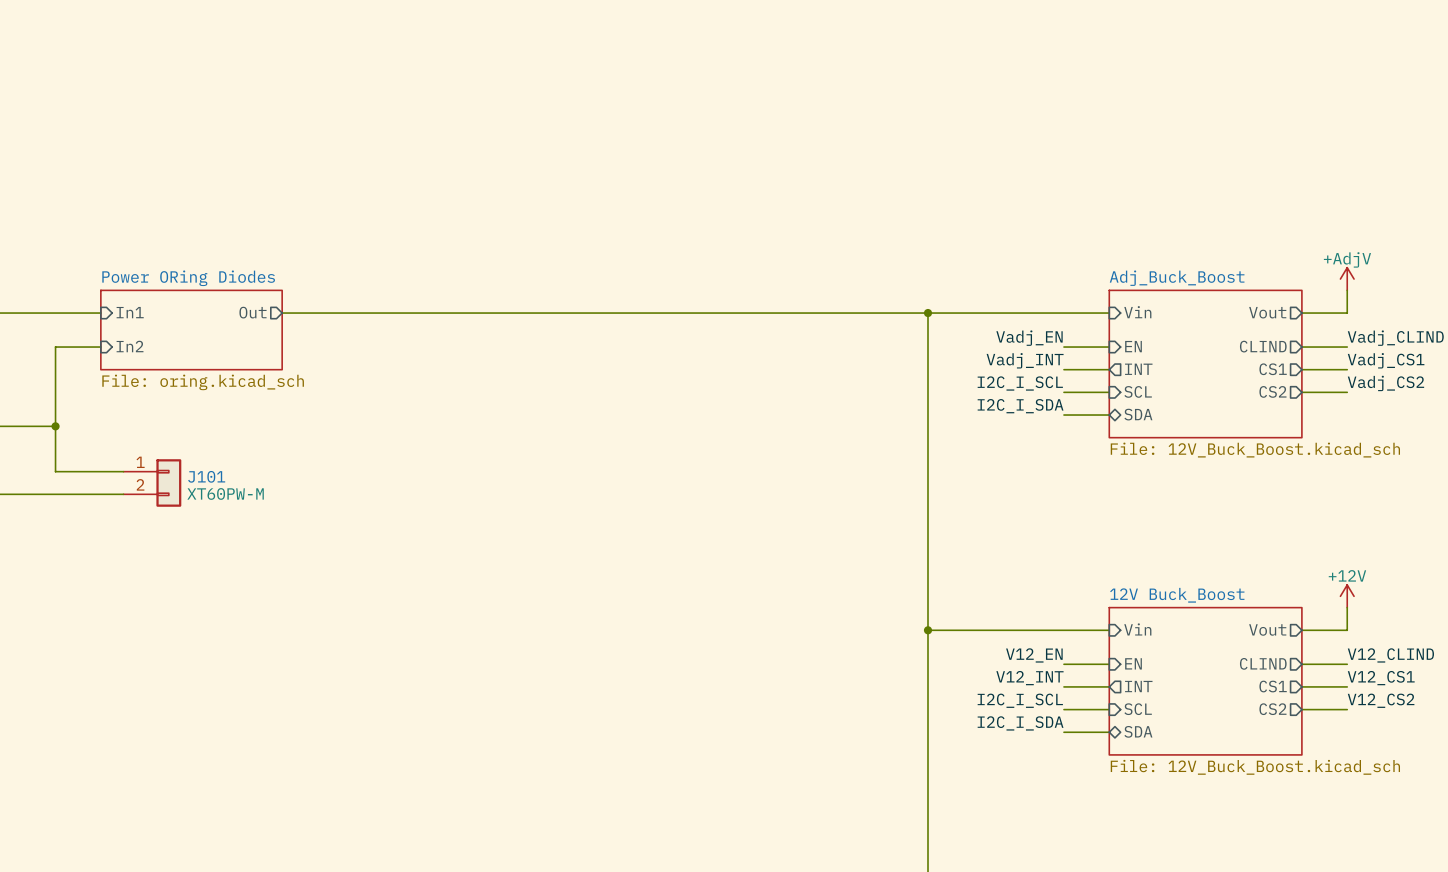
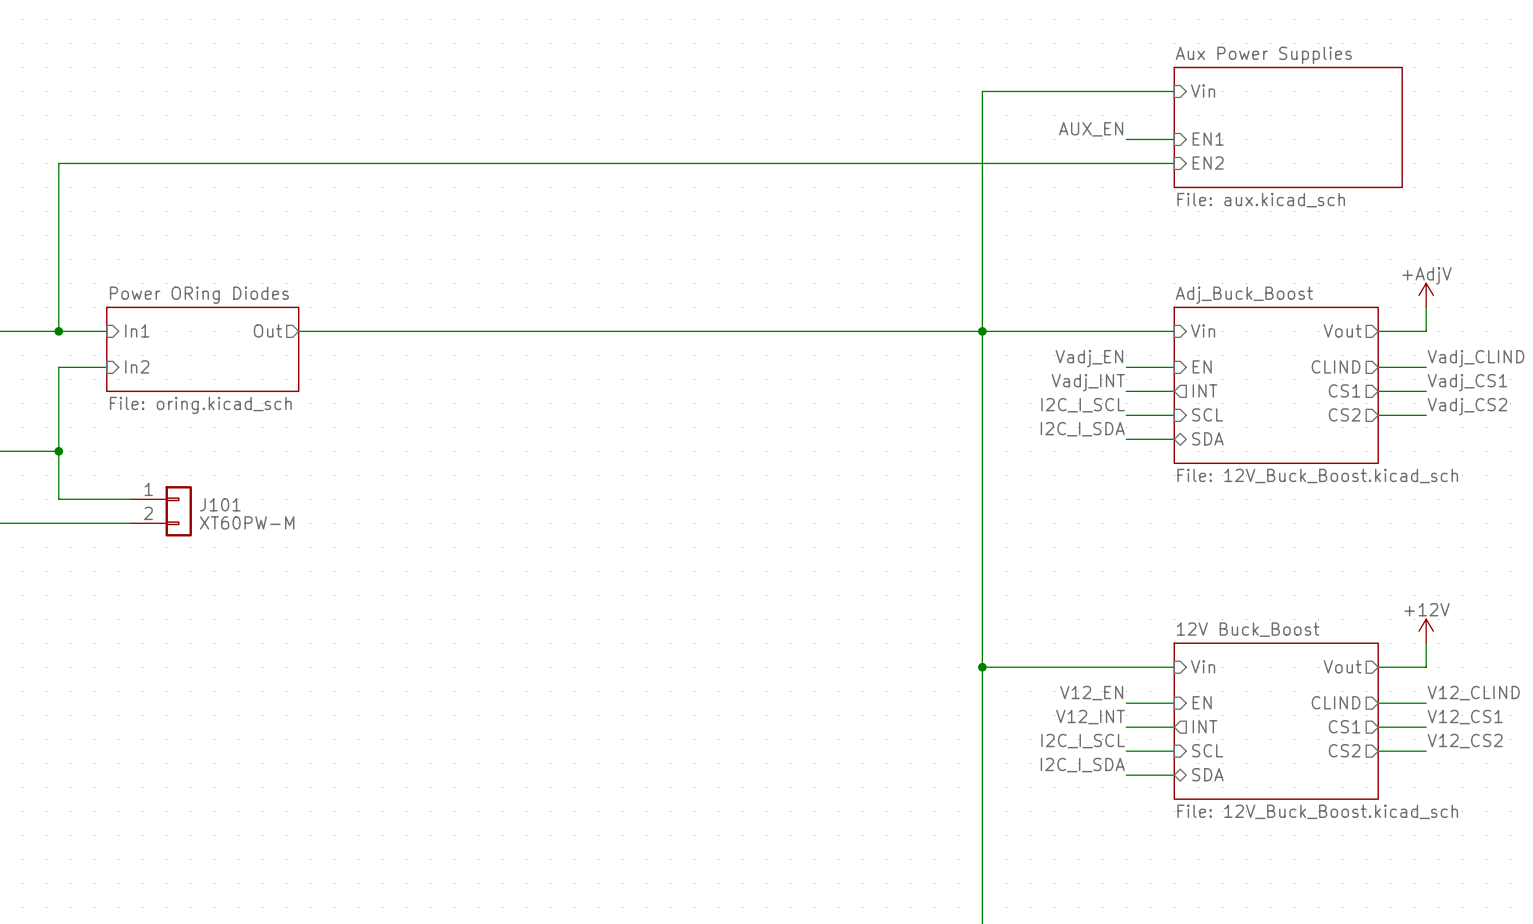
sheet pin: none -> Vin (1203, 91)
wire: none -> (1174, 91) (982, 91) (982, 331)
sheet Aux Power Supplies: none -> File: aux.kicad_sch (1288, 127)
label: none -> AUX_EN (1091, 129)
wire: none -> (1126, 139) (1174, 139)
sheet pin: none -> EN1 (1208, 139)
sheet pin: none -> EN2 (1208, 163)
wire: none -> (1174, 163) (58, 163) (58, 331)
junction: none -> (58, 331)

